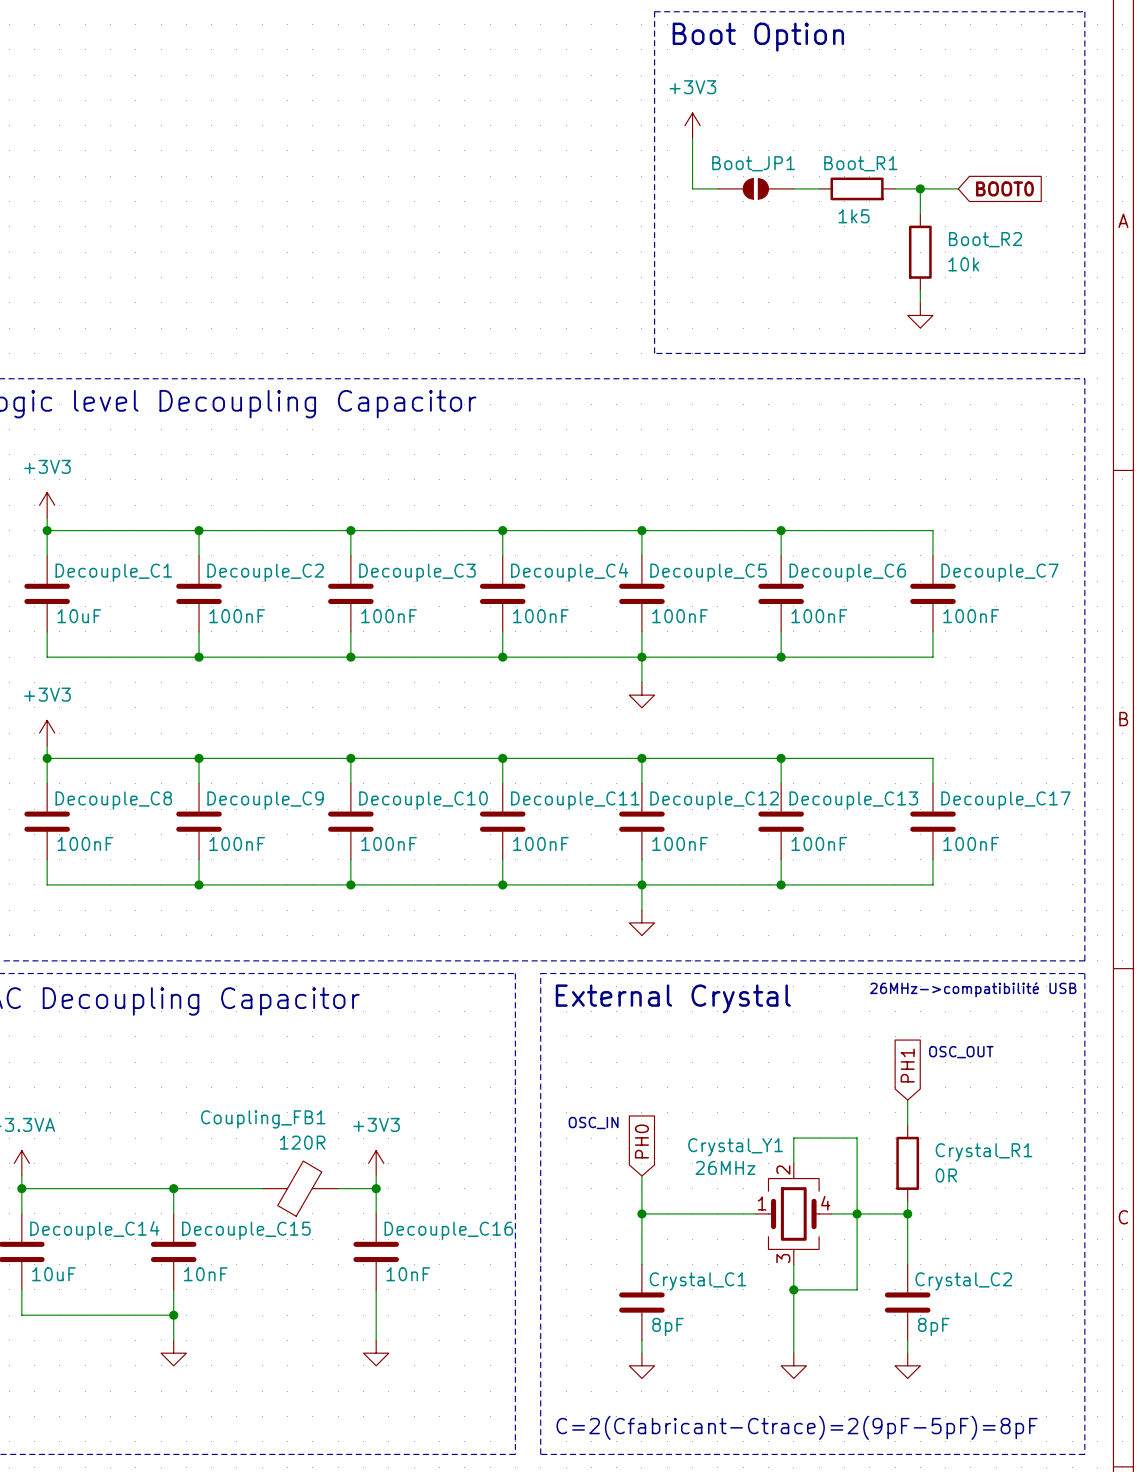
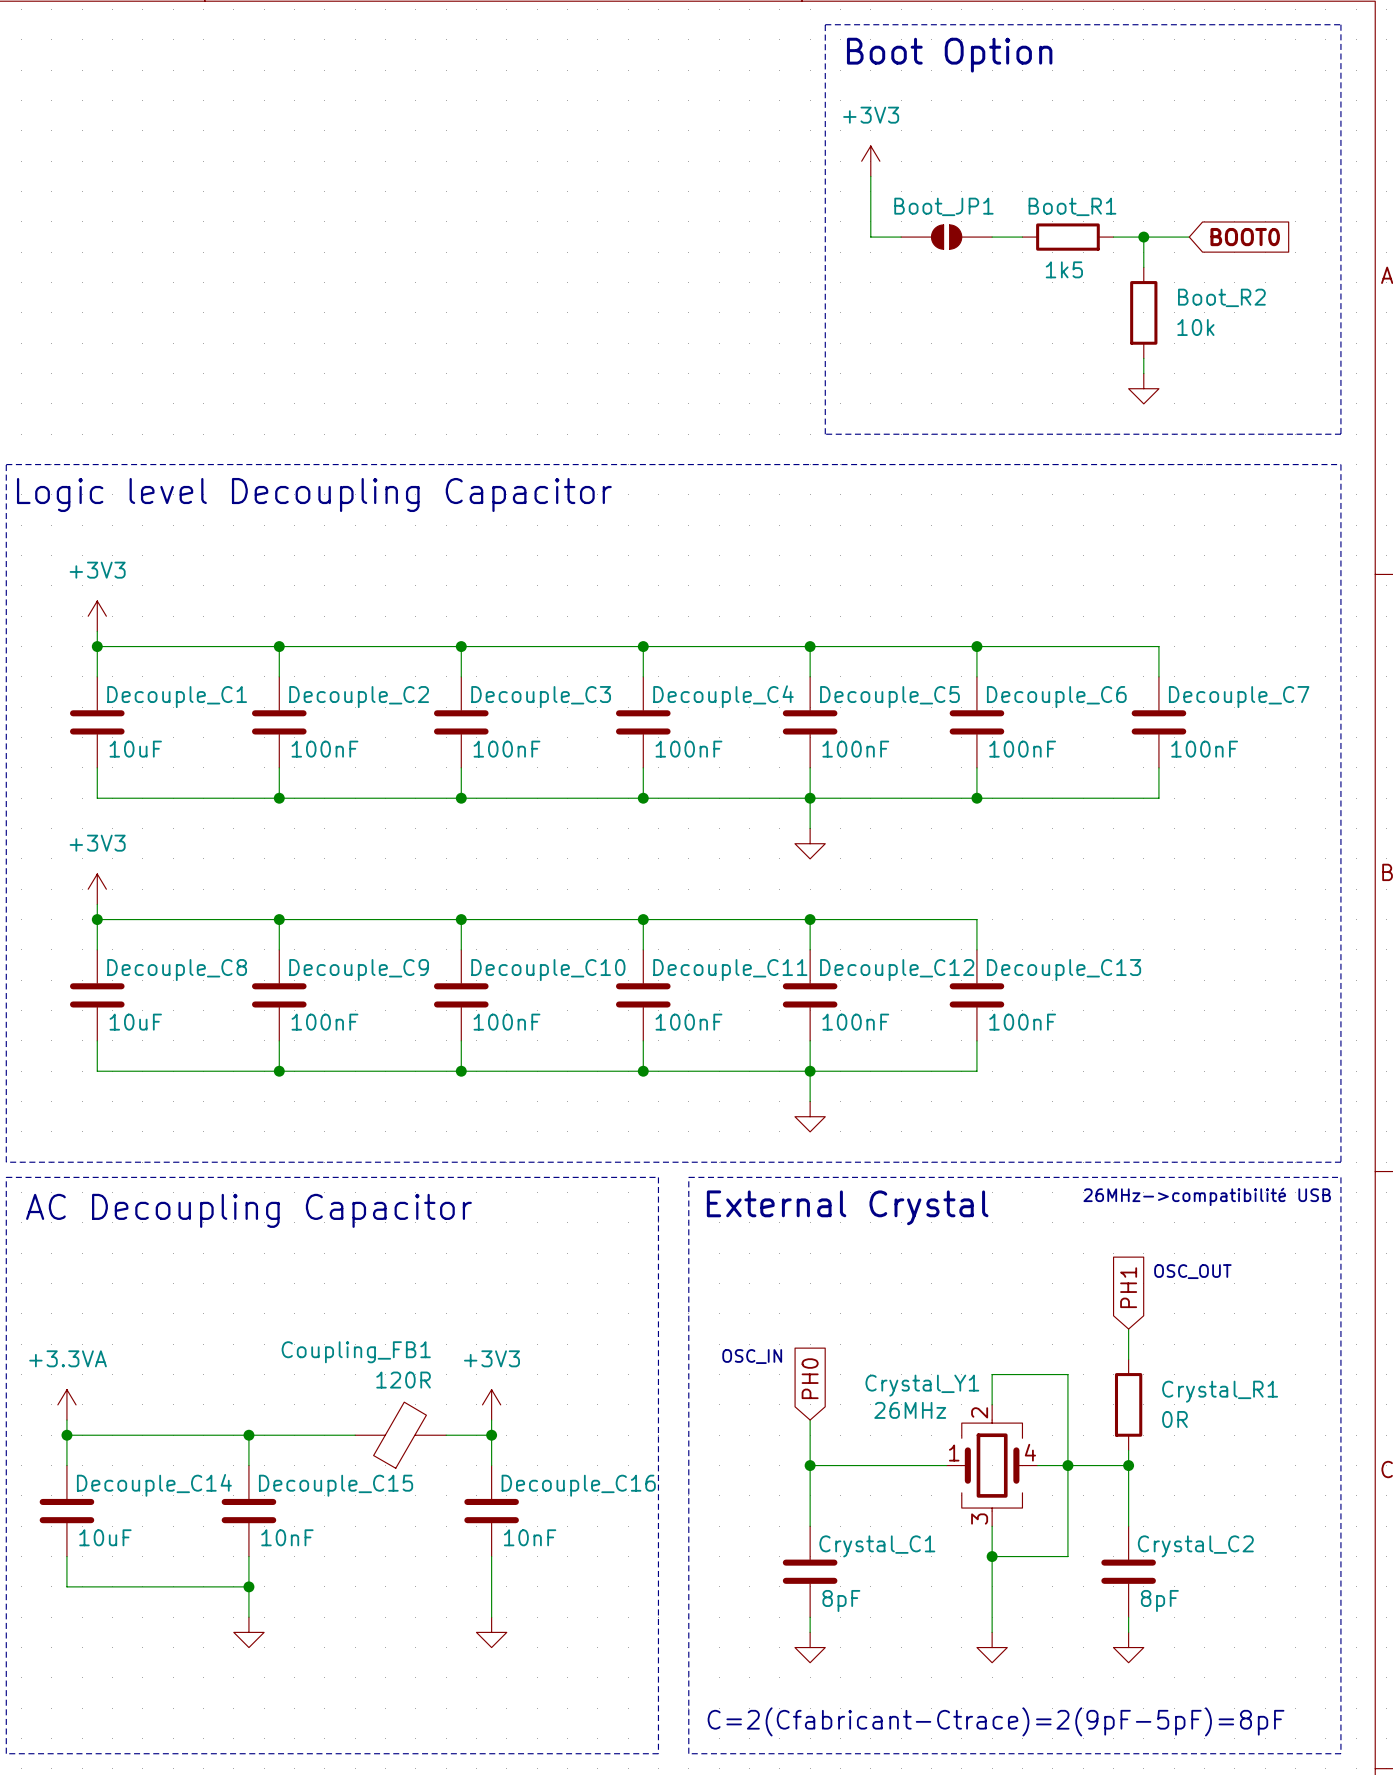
wire: (781, 758) (933, 758) (933, 783) -> none
junction: (781, 758) -> none
Decouple_C17: 100nF (933, 821) -> none
Decouple_C8 value: 100nF (85, 843) -> 10uF (135, 1022)
wire: (933, 859) (933, 884) (781, 884) -> none
junction: (781, 884) -> none

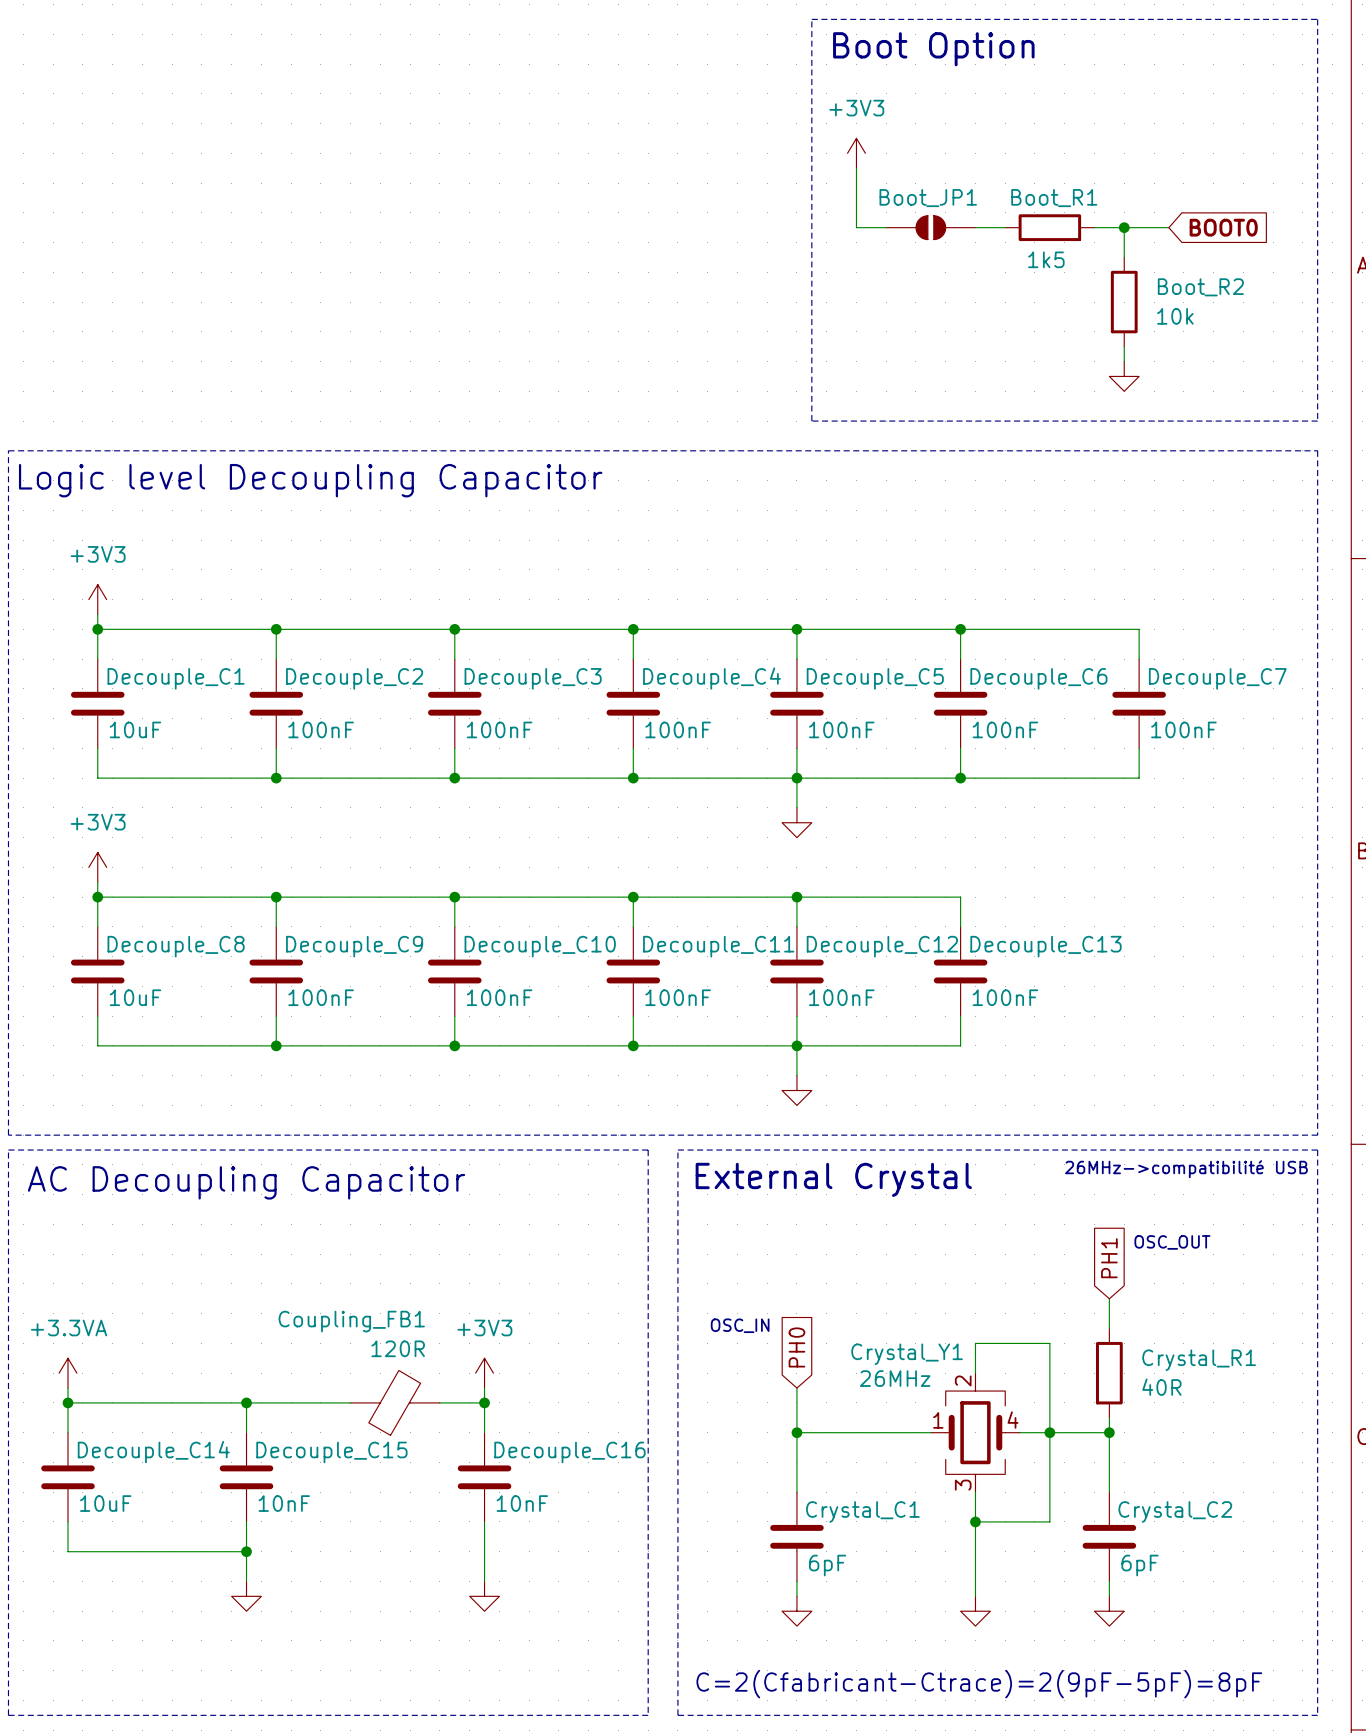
Crystal_R1 value: 0R (1174, 1419) -> 40R (1161, 1387)
Crystal_C1 value: 8pF (841, 1600) -> 6pF (827, 1565)
Crystal_C2 value: 8pF (1159, 1600) -> 6pF (1140, 1565)

